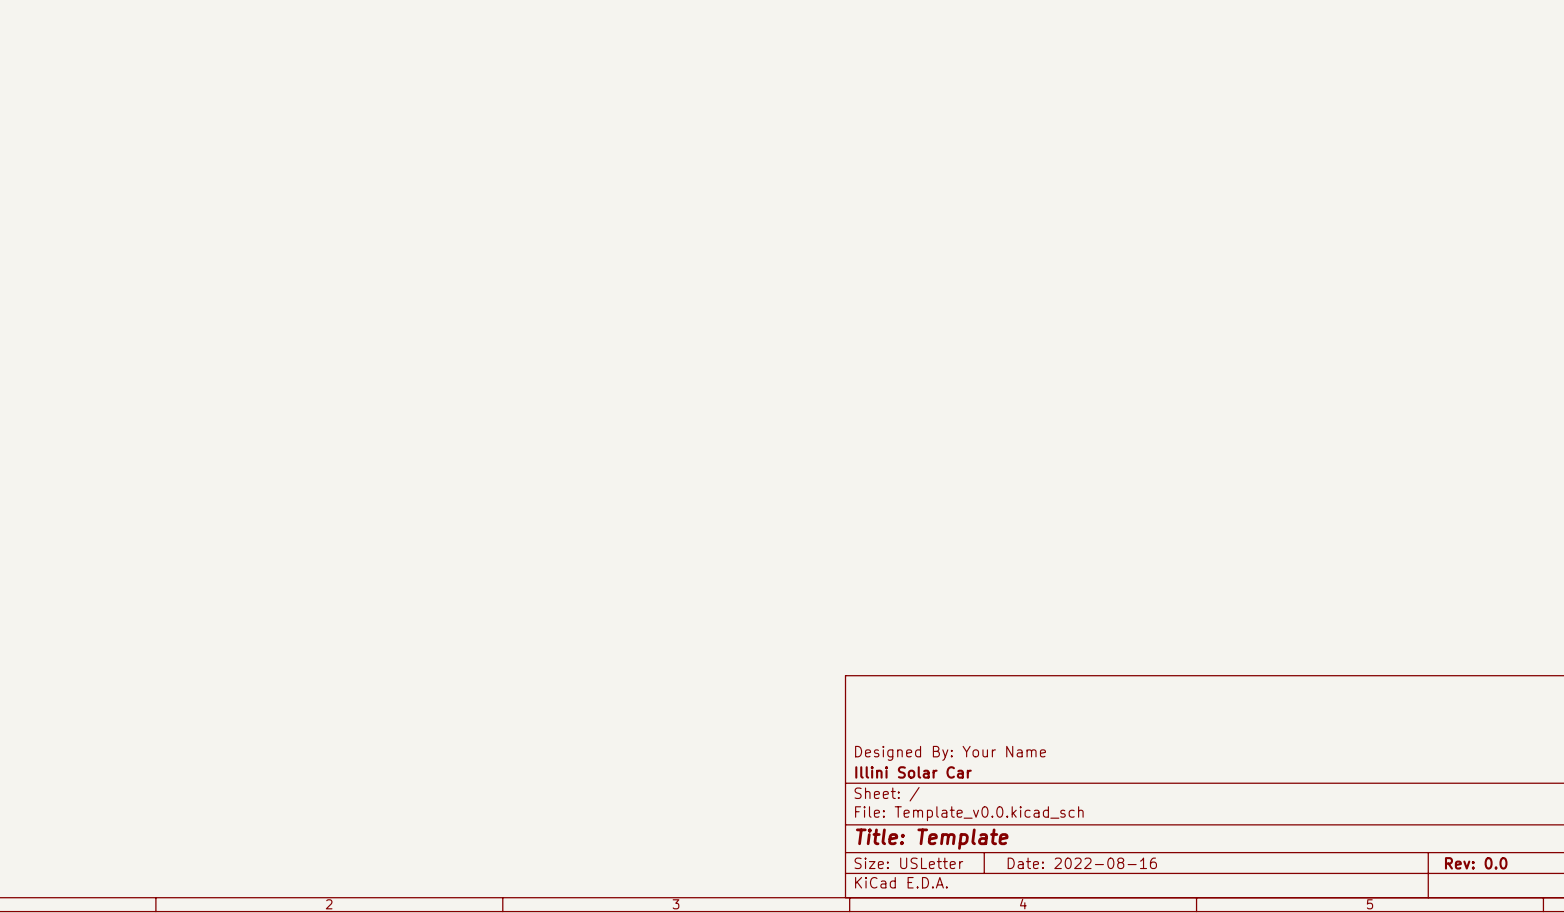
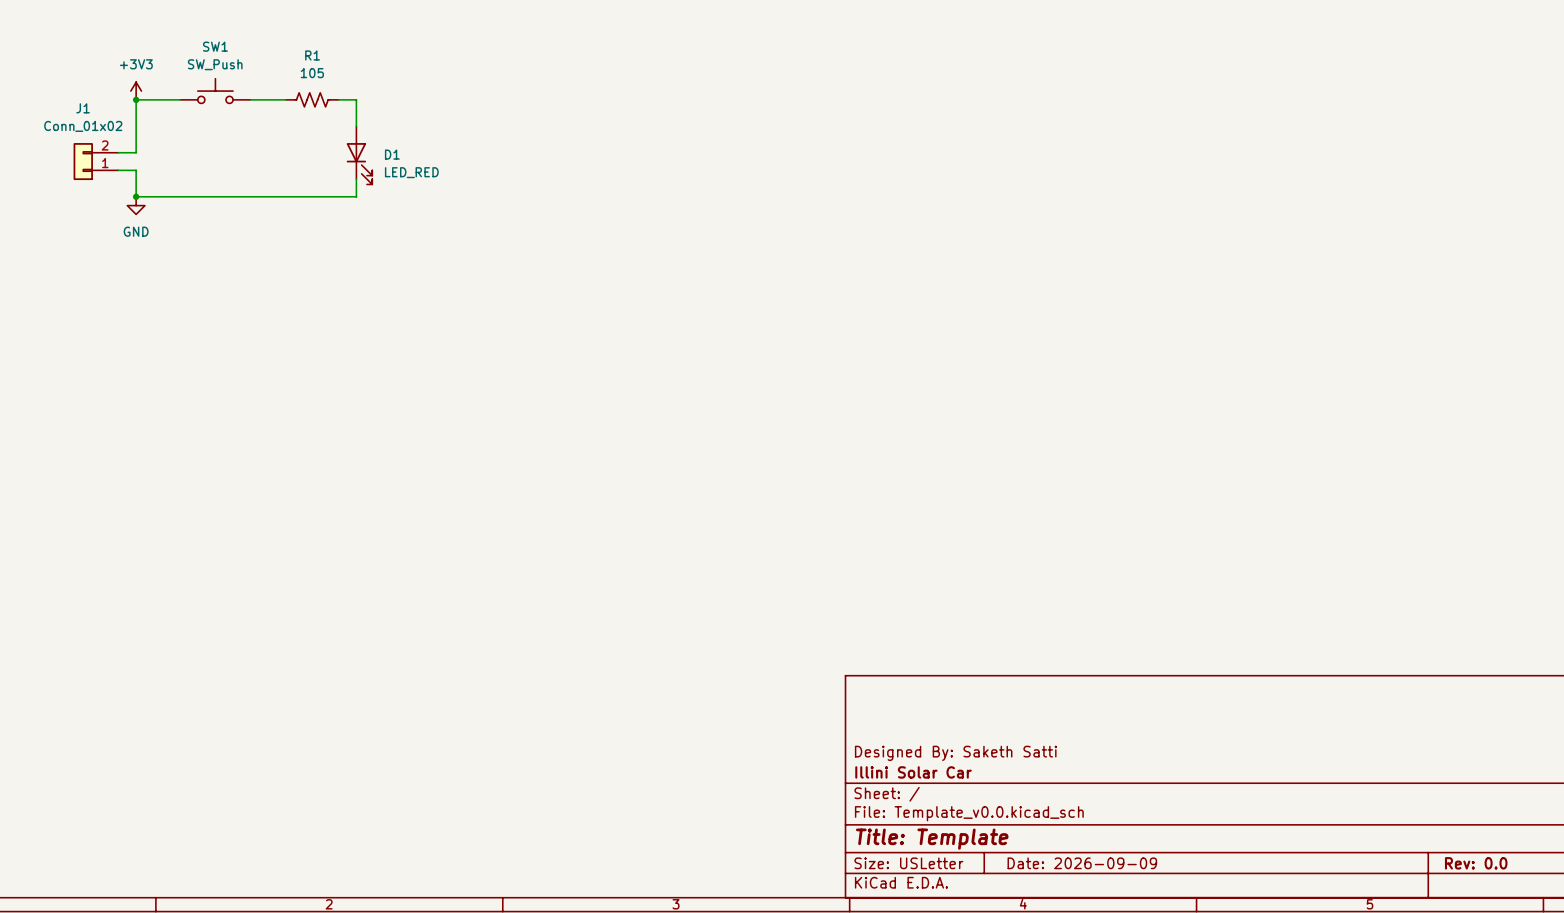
power symbol: none -> +3V3 (136, 91)
SW1: none -> SW_Push (215, 91)
junction: none -> (136, 99)
wire: none -> (180, 99) (136, 99) (136, 152) (118, 152)
wire: none -> (250, 99) (285, 99)
R1: none -> 105 (312, 99)
wire: none -> (338, 99) (356, 99) (356, 126)
D1: none -> LED_RED (359, 155)
J1: none -> Conn_01x02 (96, 161)
wire: none -> (118, 170) (136, 170) (136, 196) (356, 196) (356, 179)
junction: none -> (136, 196)
power symbol: none -> GND (136, 205)
title block: Designed By: Your Name (950, 753) -> Designed By: Saketh Satti (955, 753)
title block: Date: 2022-08-16 (1082, 863) -> Date: 2026-09-09 (1082, 863)

